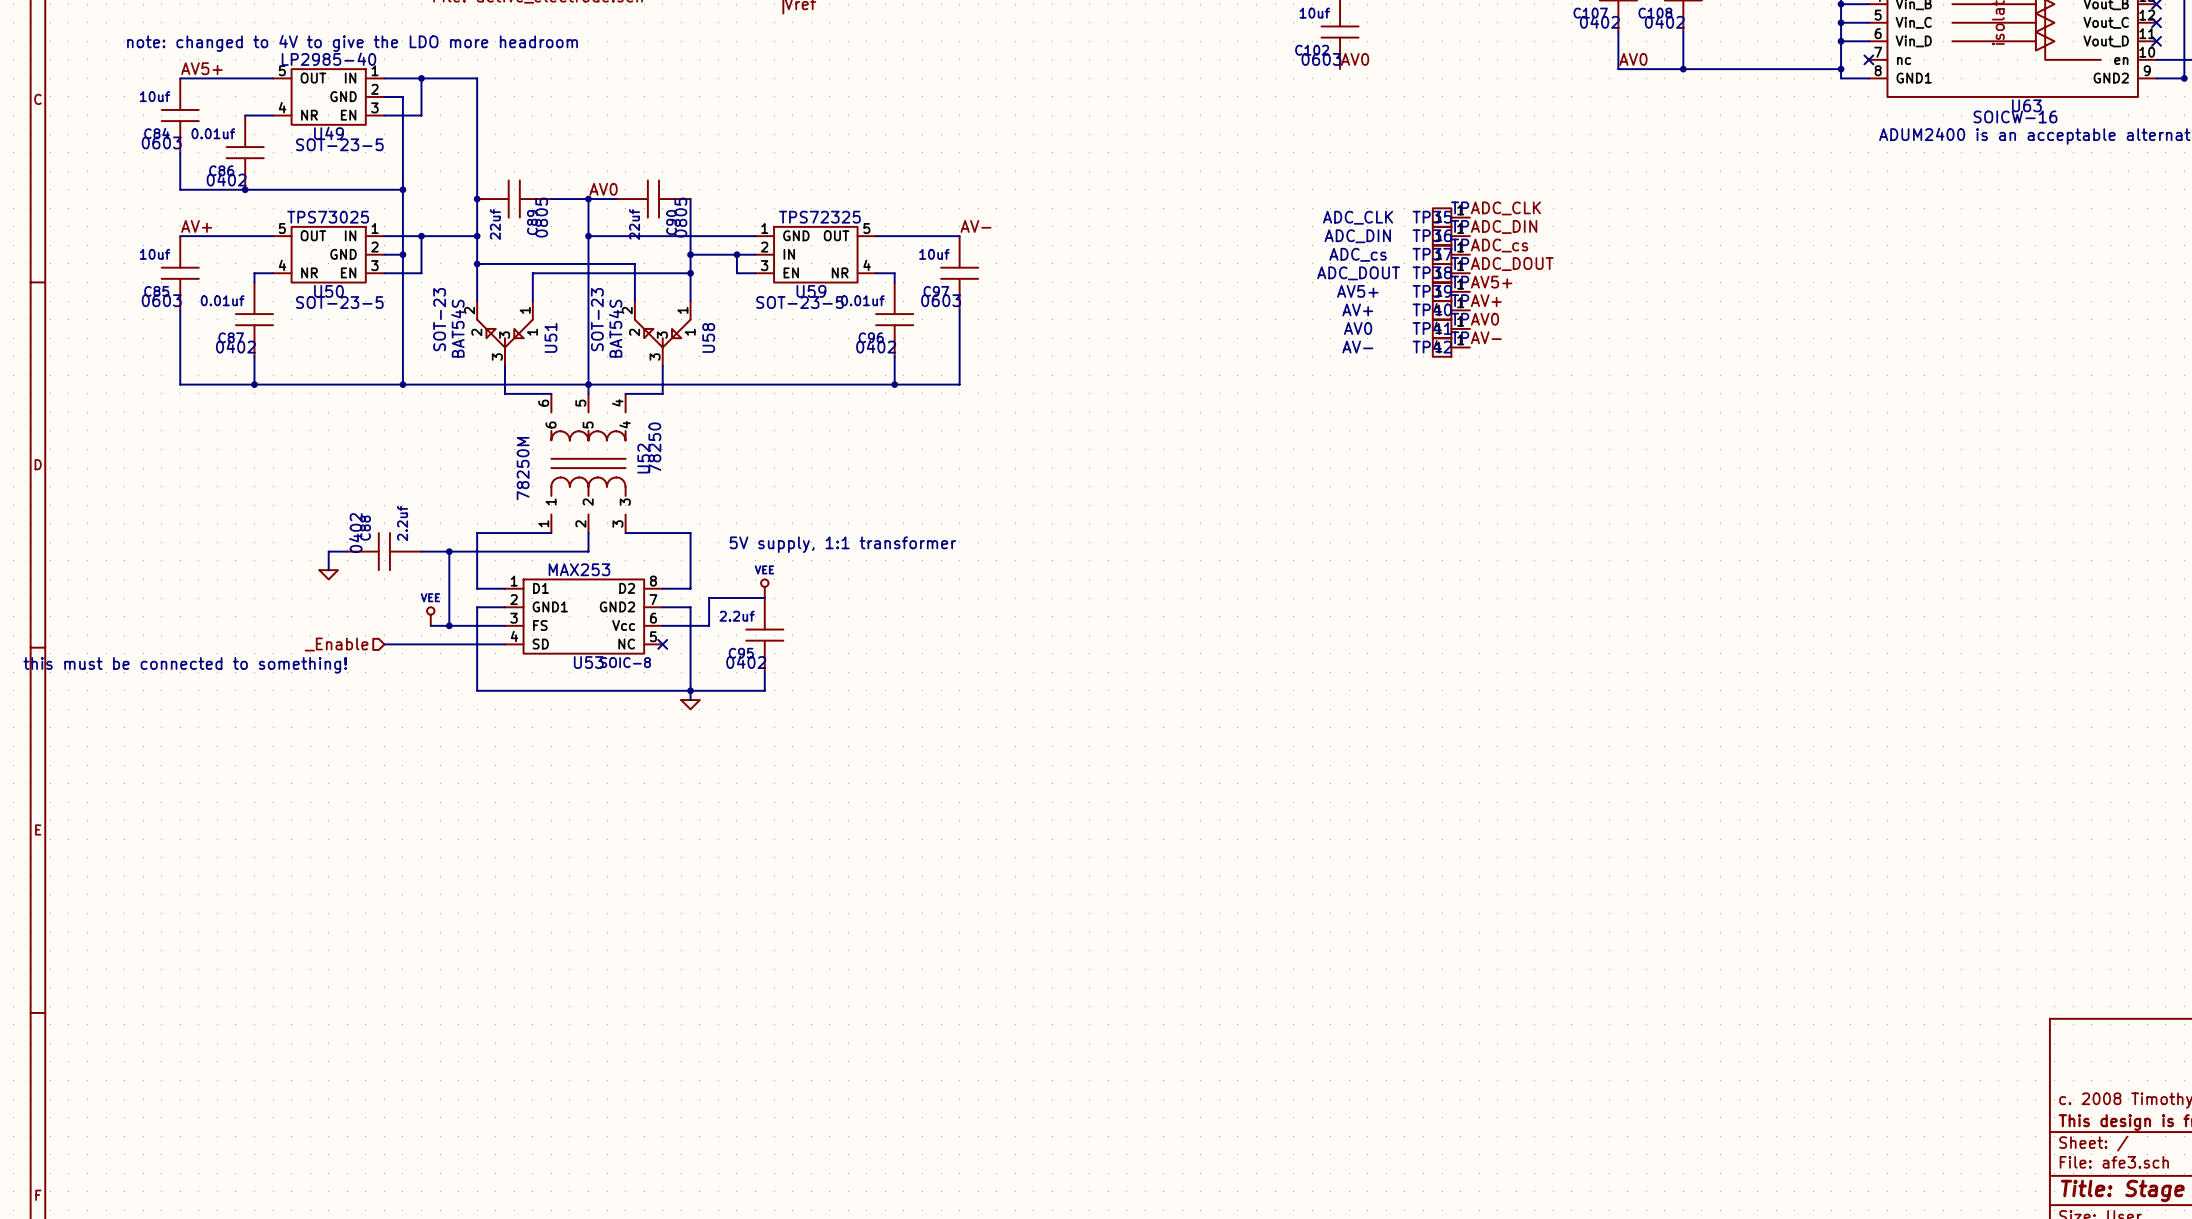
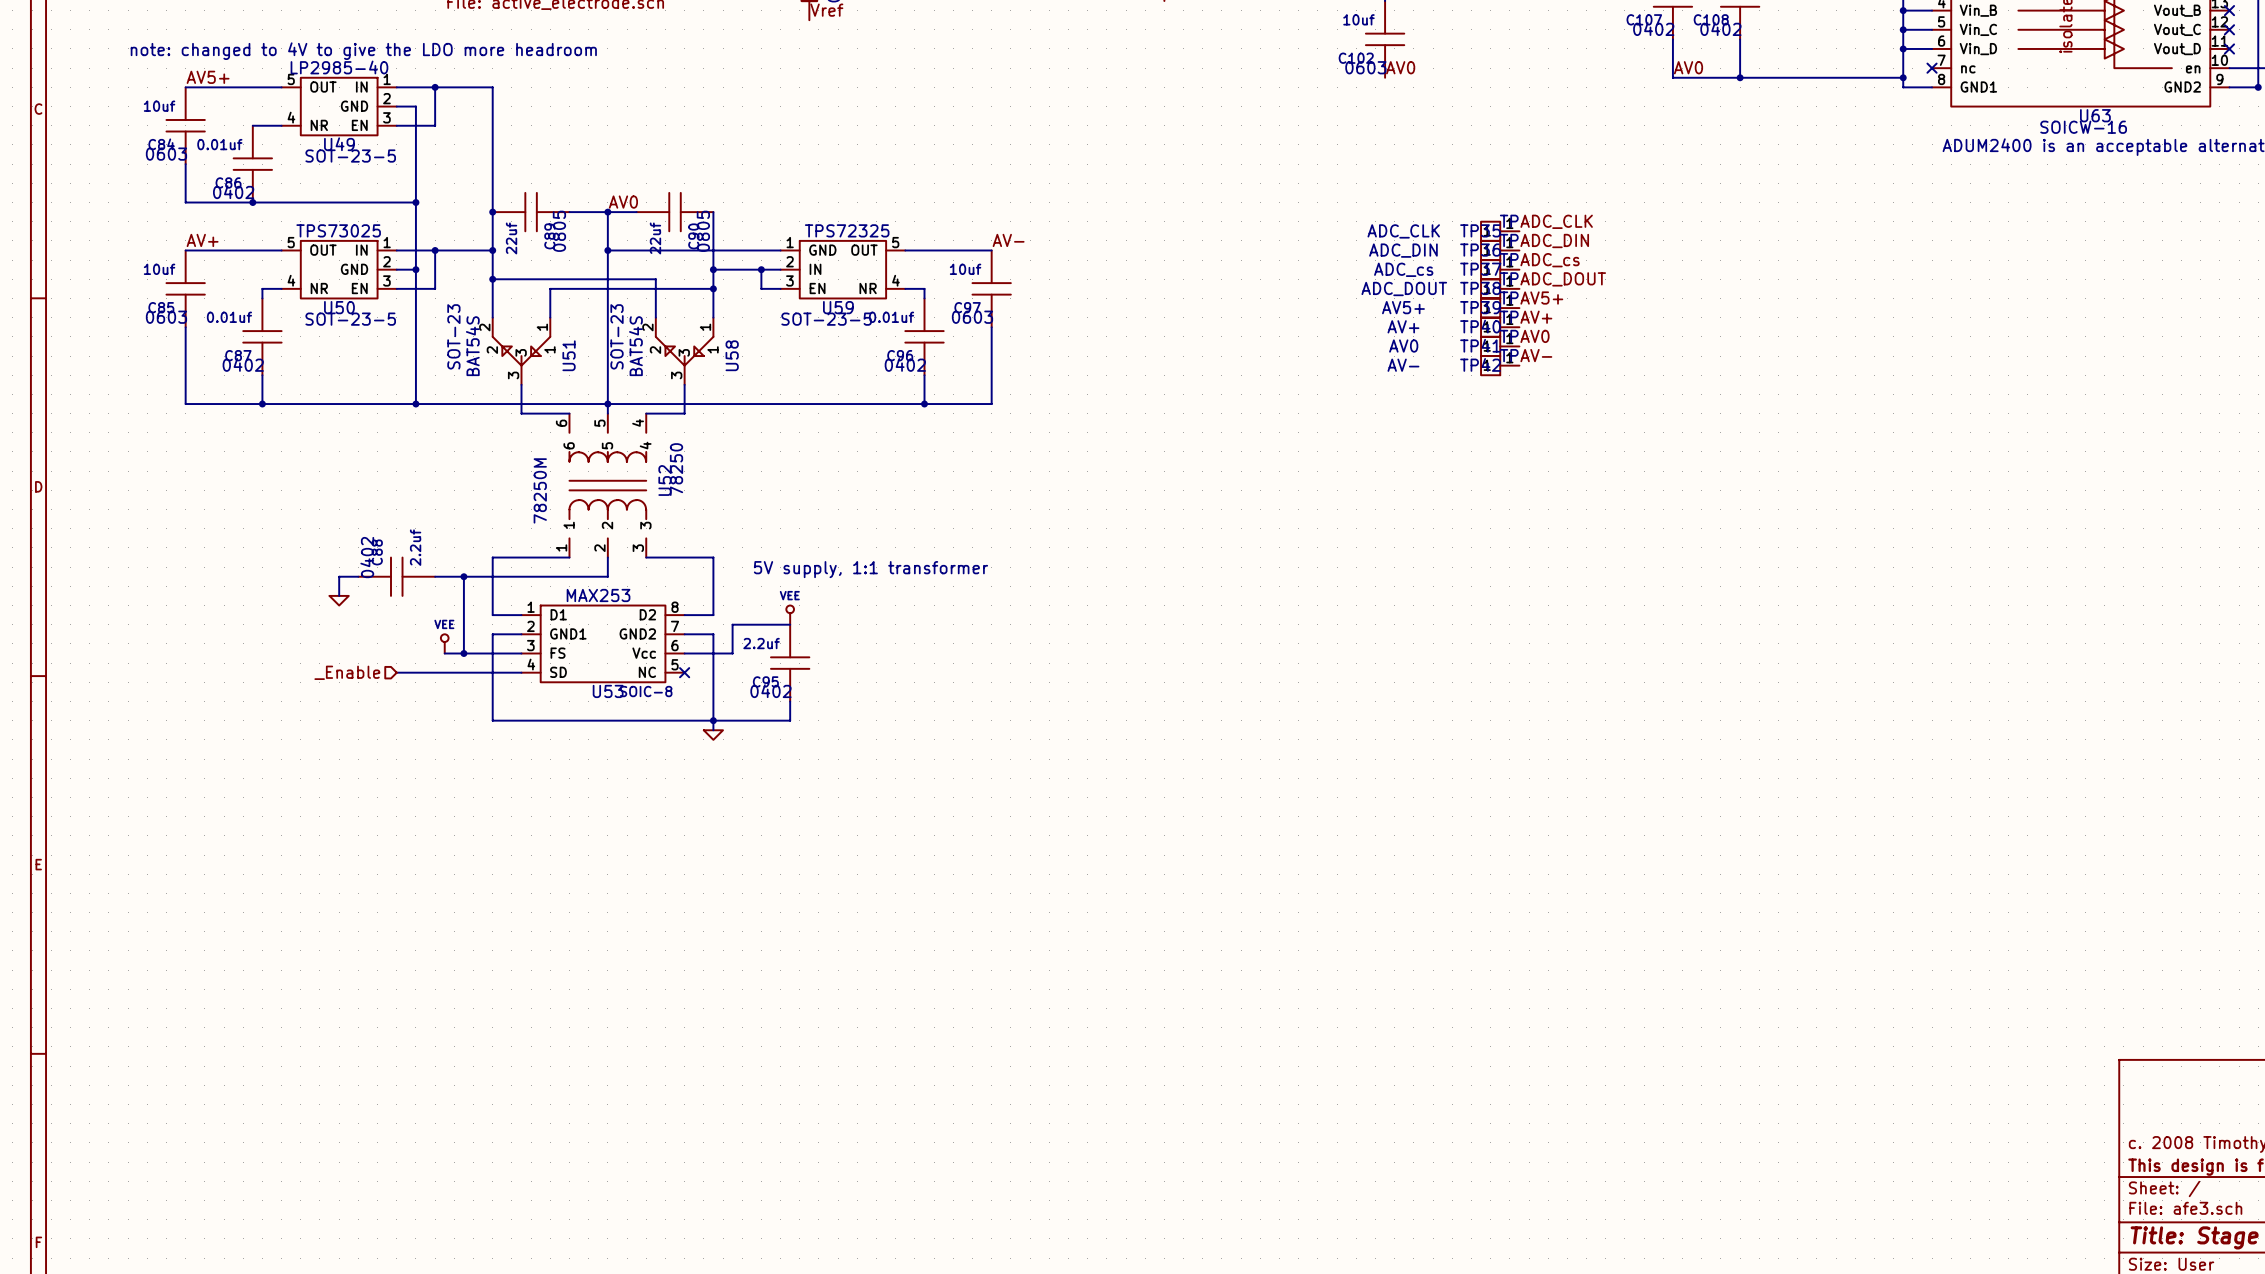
text: this must be connected to something! (185, 665) -> none

